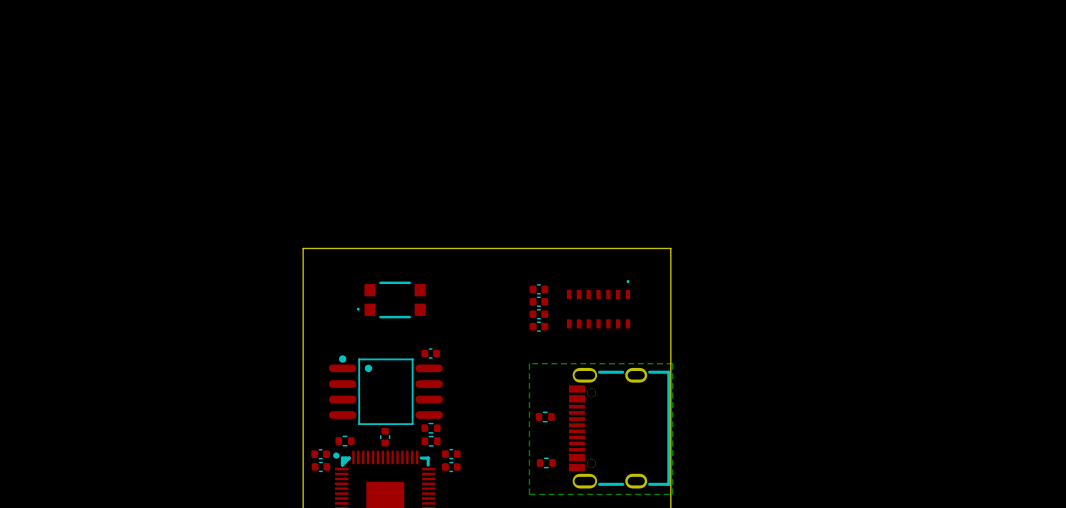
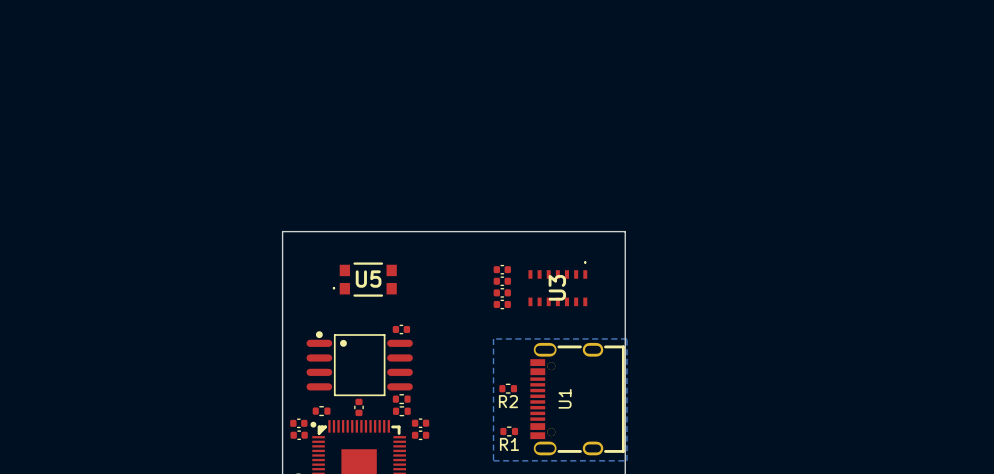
U5 name: none -> U5 (368, 279)
U3 name: none -> U3 (557, 287)
U1 name: none -> U1 (565, 398)
R2 name: none -> R2 (508, 401)
R1 name: none -> R1 (509, 444)

